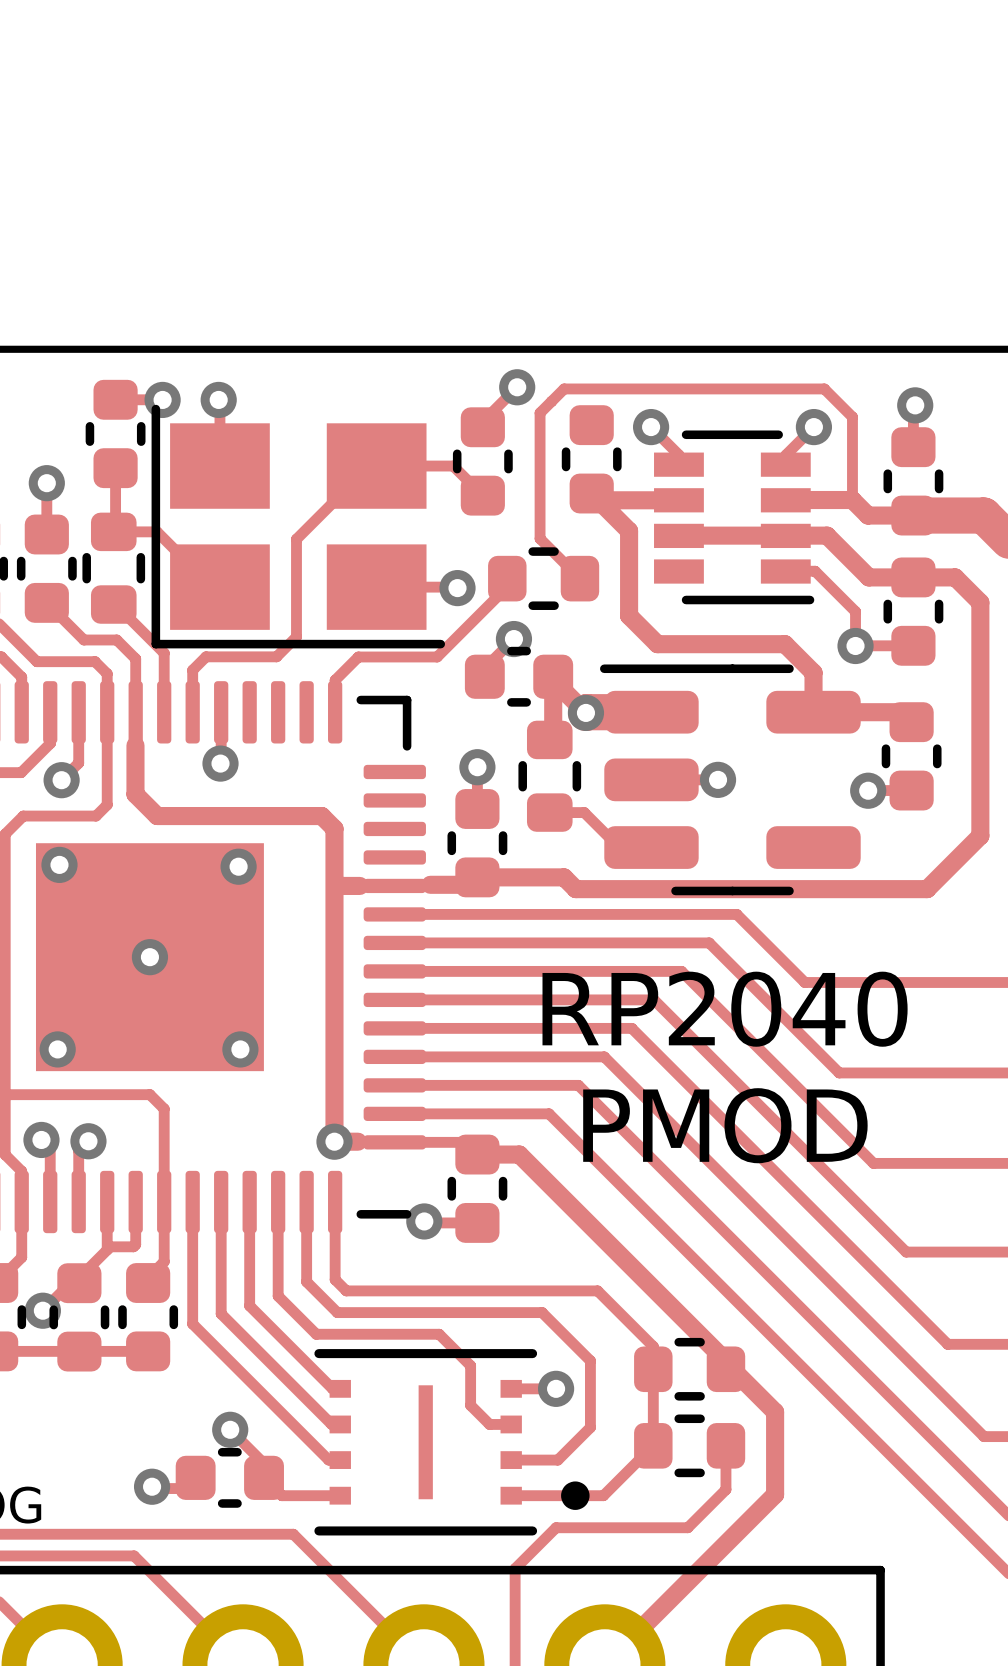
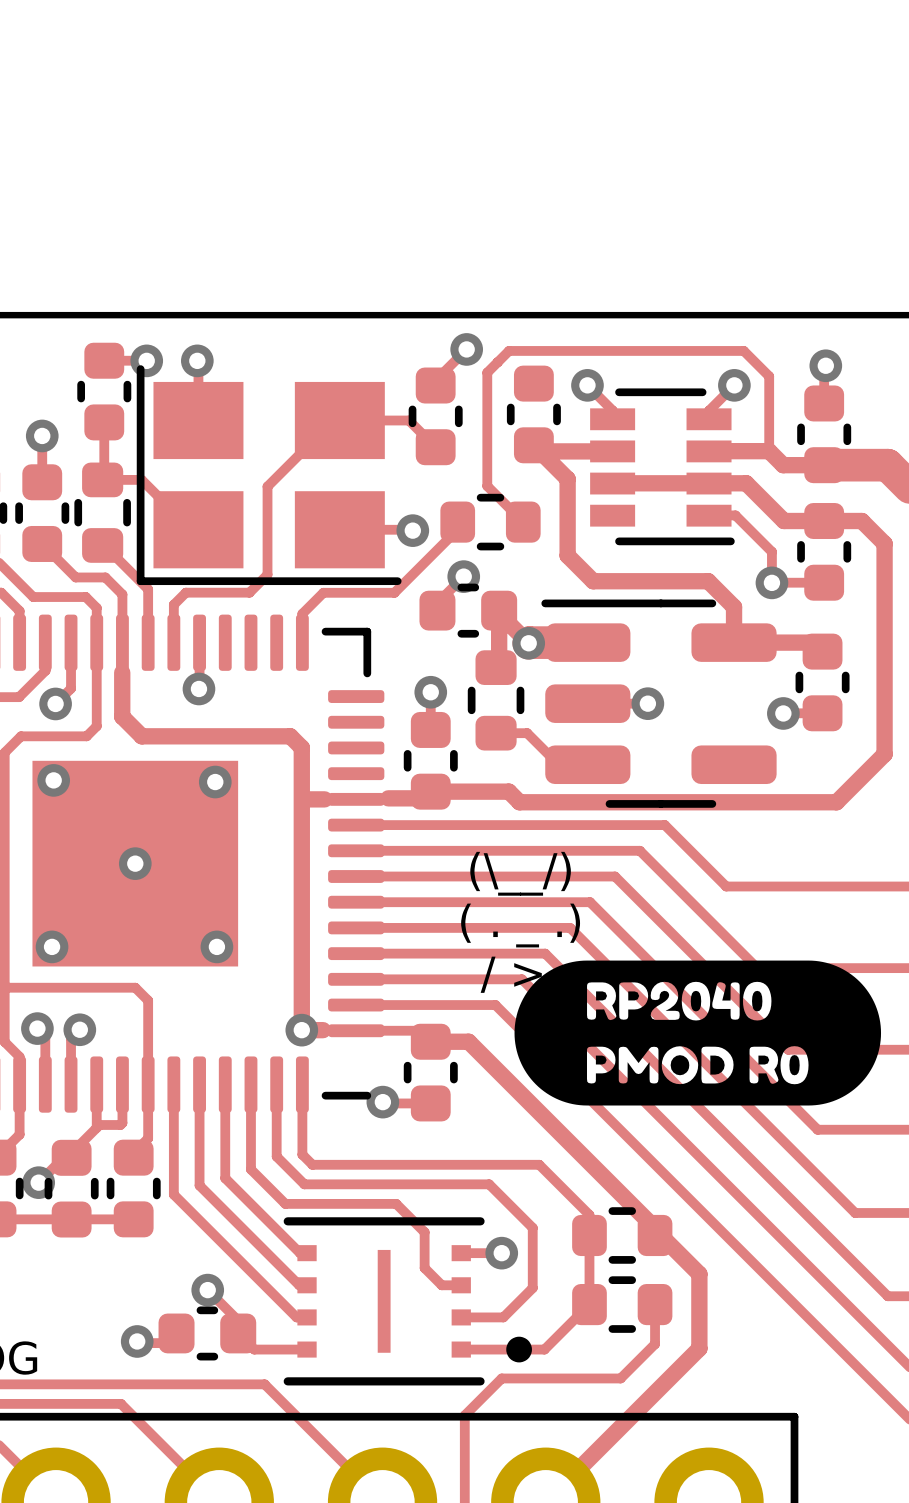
text: none -> (\__/) (520, 873)
text: RP2040 (725, 1009) -> none
text: none -> ( . _ .) (520, 925)
drawing: none -> [514, 960, 882, 1106]
text: none -> / > (511, 974)
text: PMOD (725, 1125) -> none

